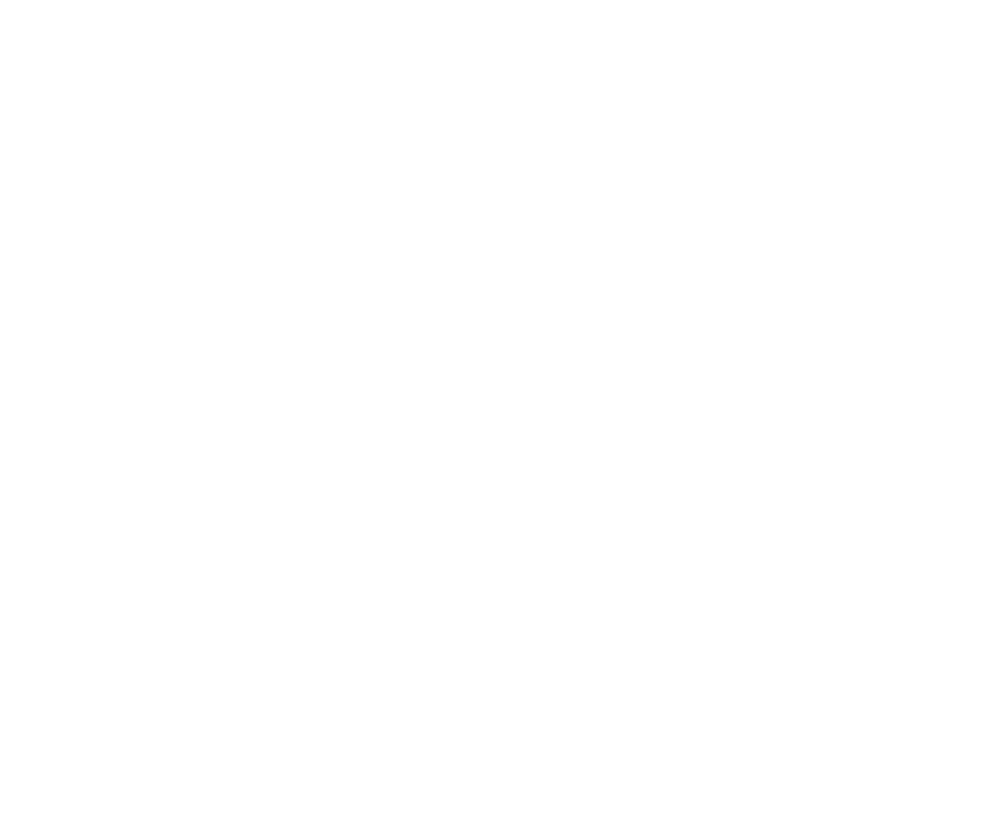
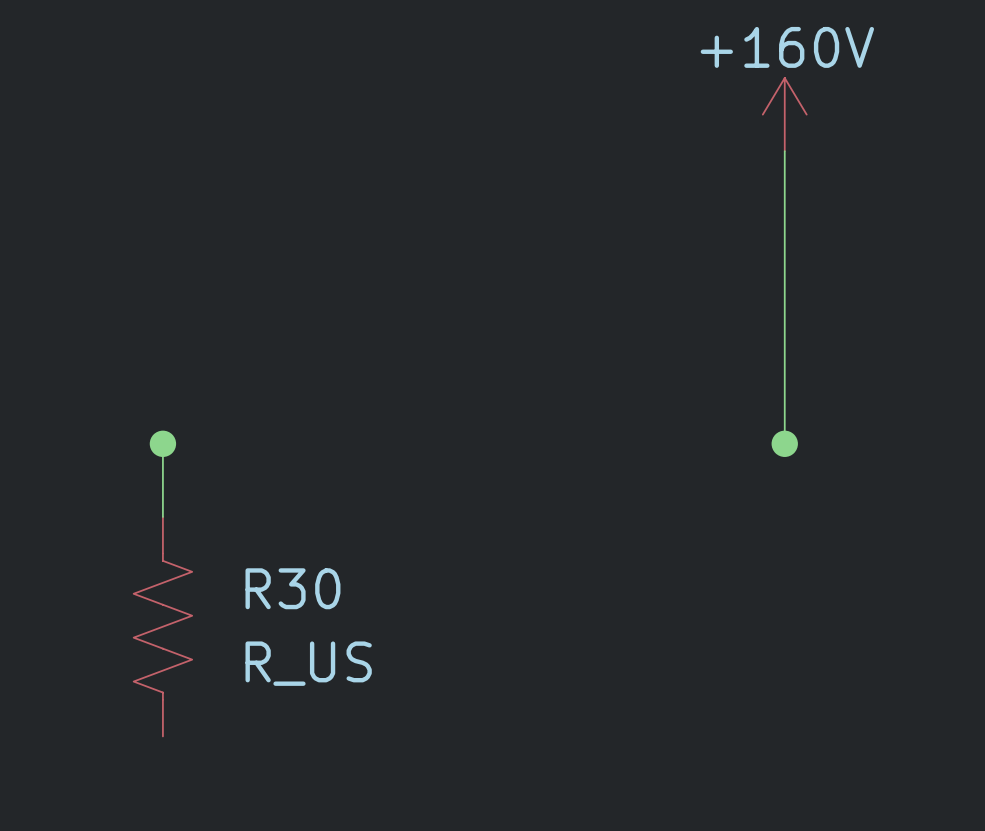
power symbol: none -> +160V (784, 114)
wire: none -> (784, 151) (784, 443)
wire: none -> (162, 443) (162, 516)
junction: none -> (162, 443)
junction: none -> (784, 443)
R30: none -> R_US (162, 626)

